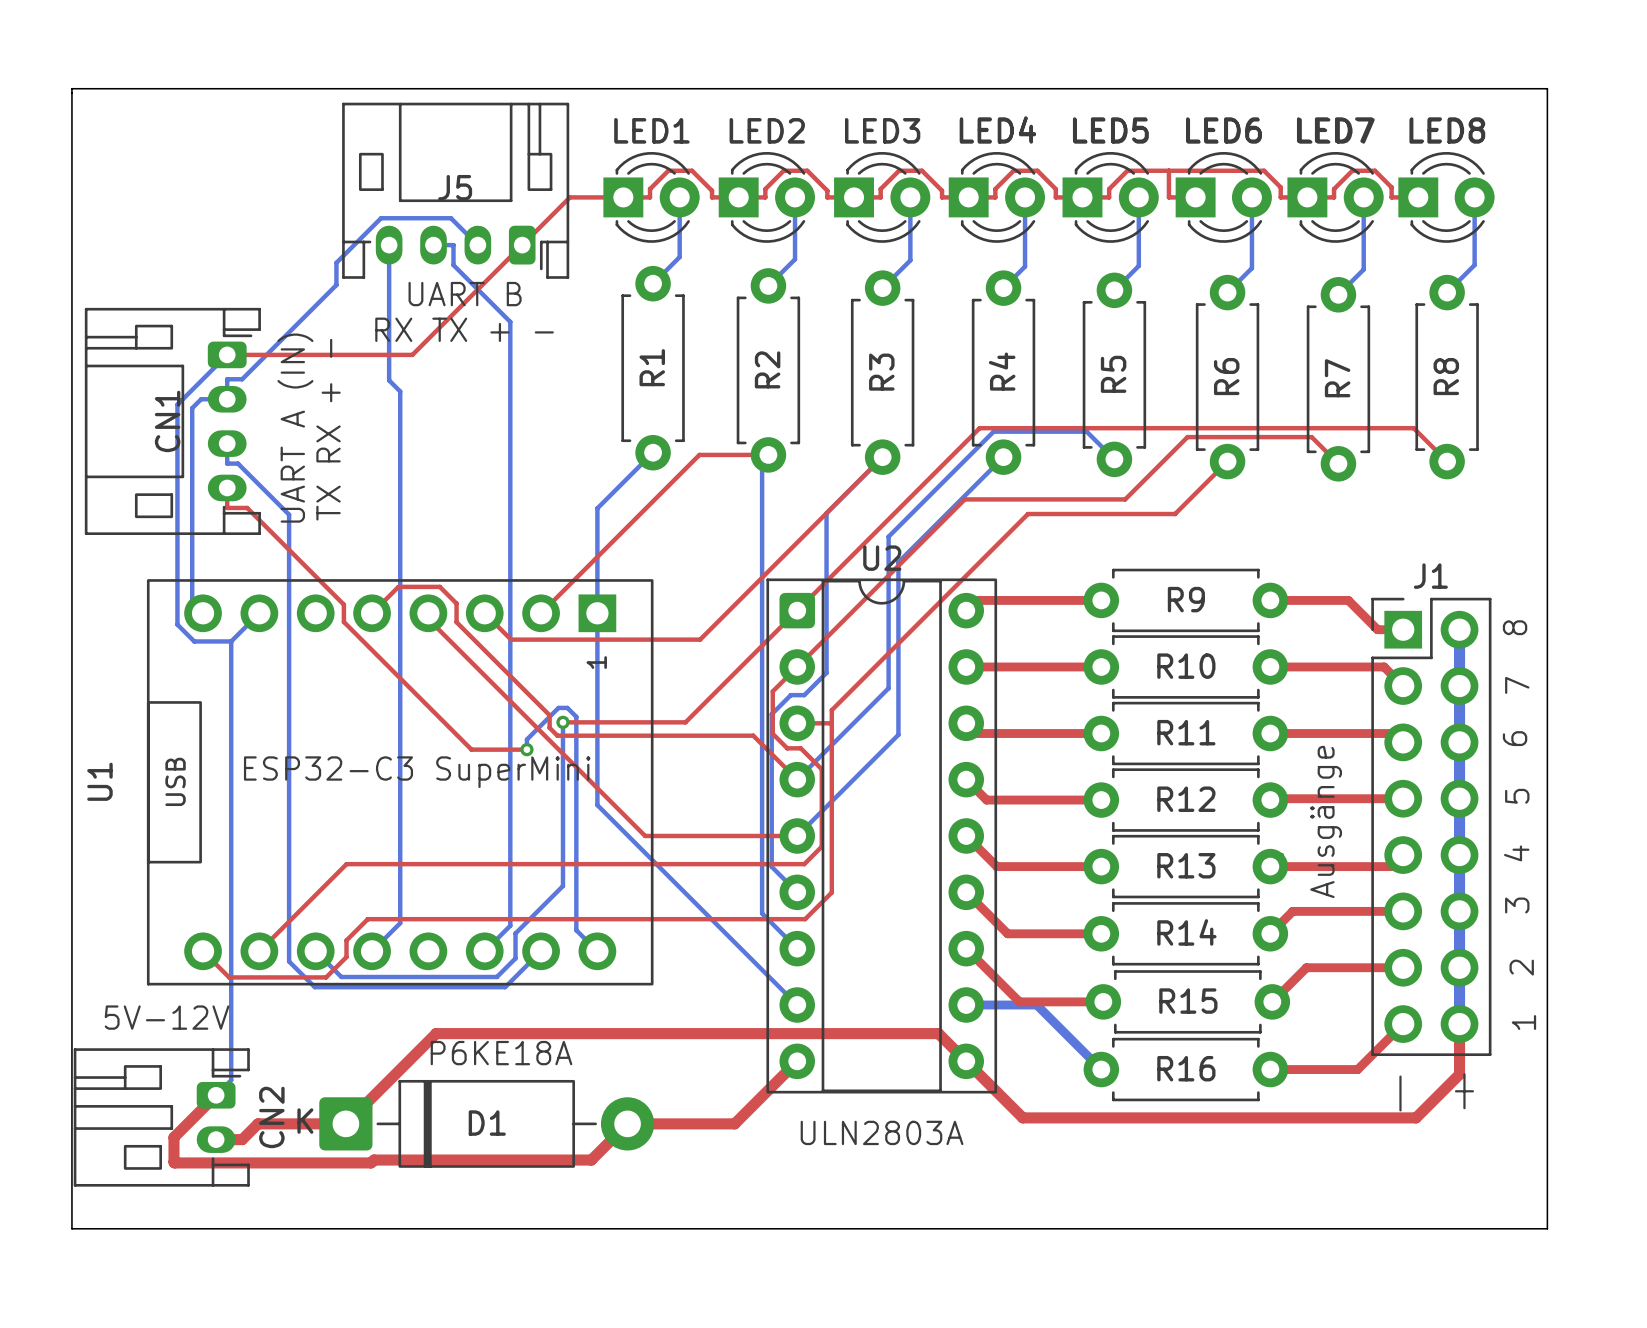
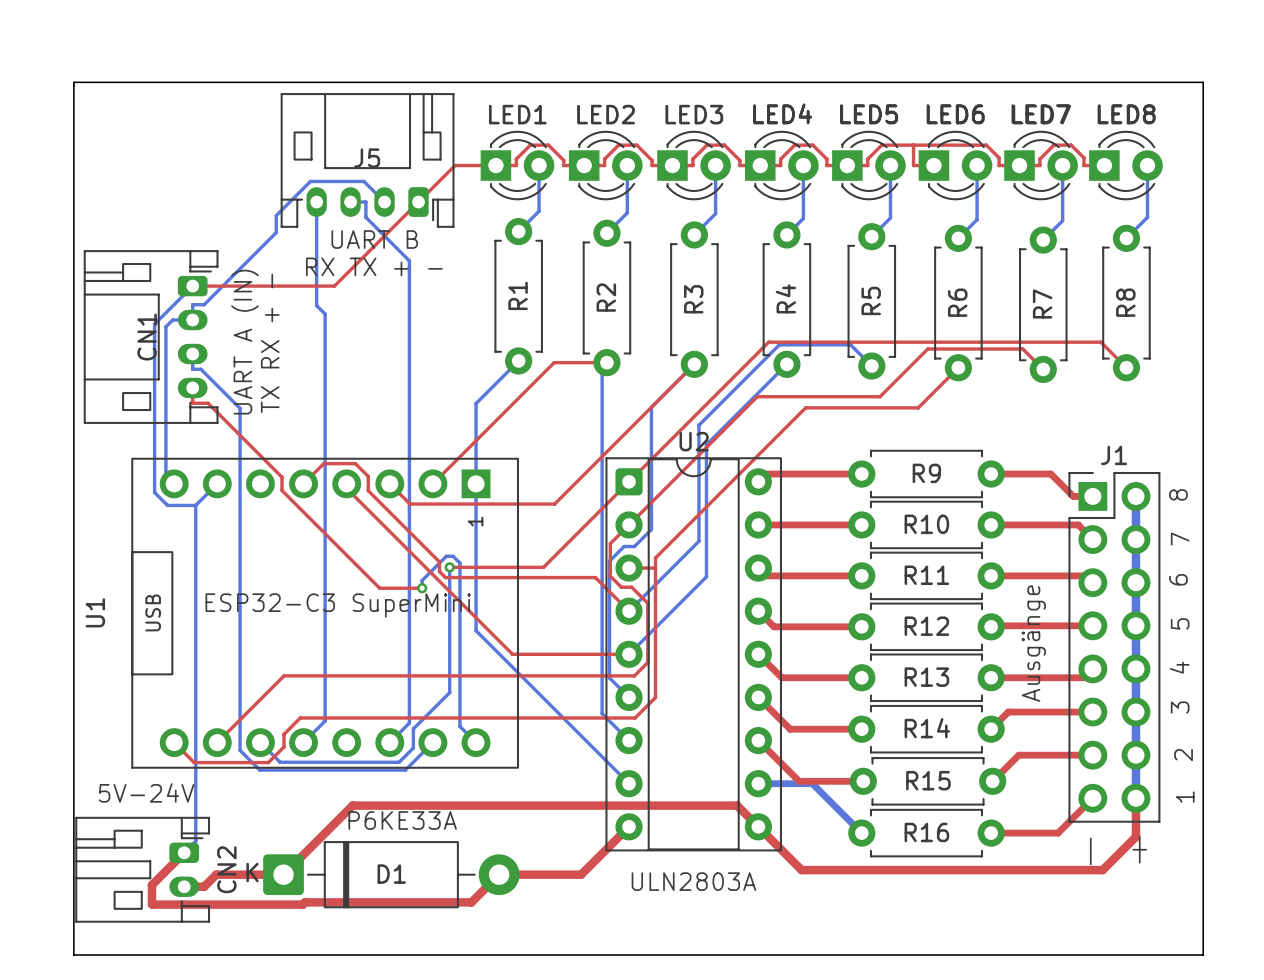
text: 5V-12V (167, 1017) -> 5V-24V (146, 792)
text: P6KE18A (501, 1053) -> P6KE33A (402, 820)

